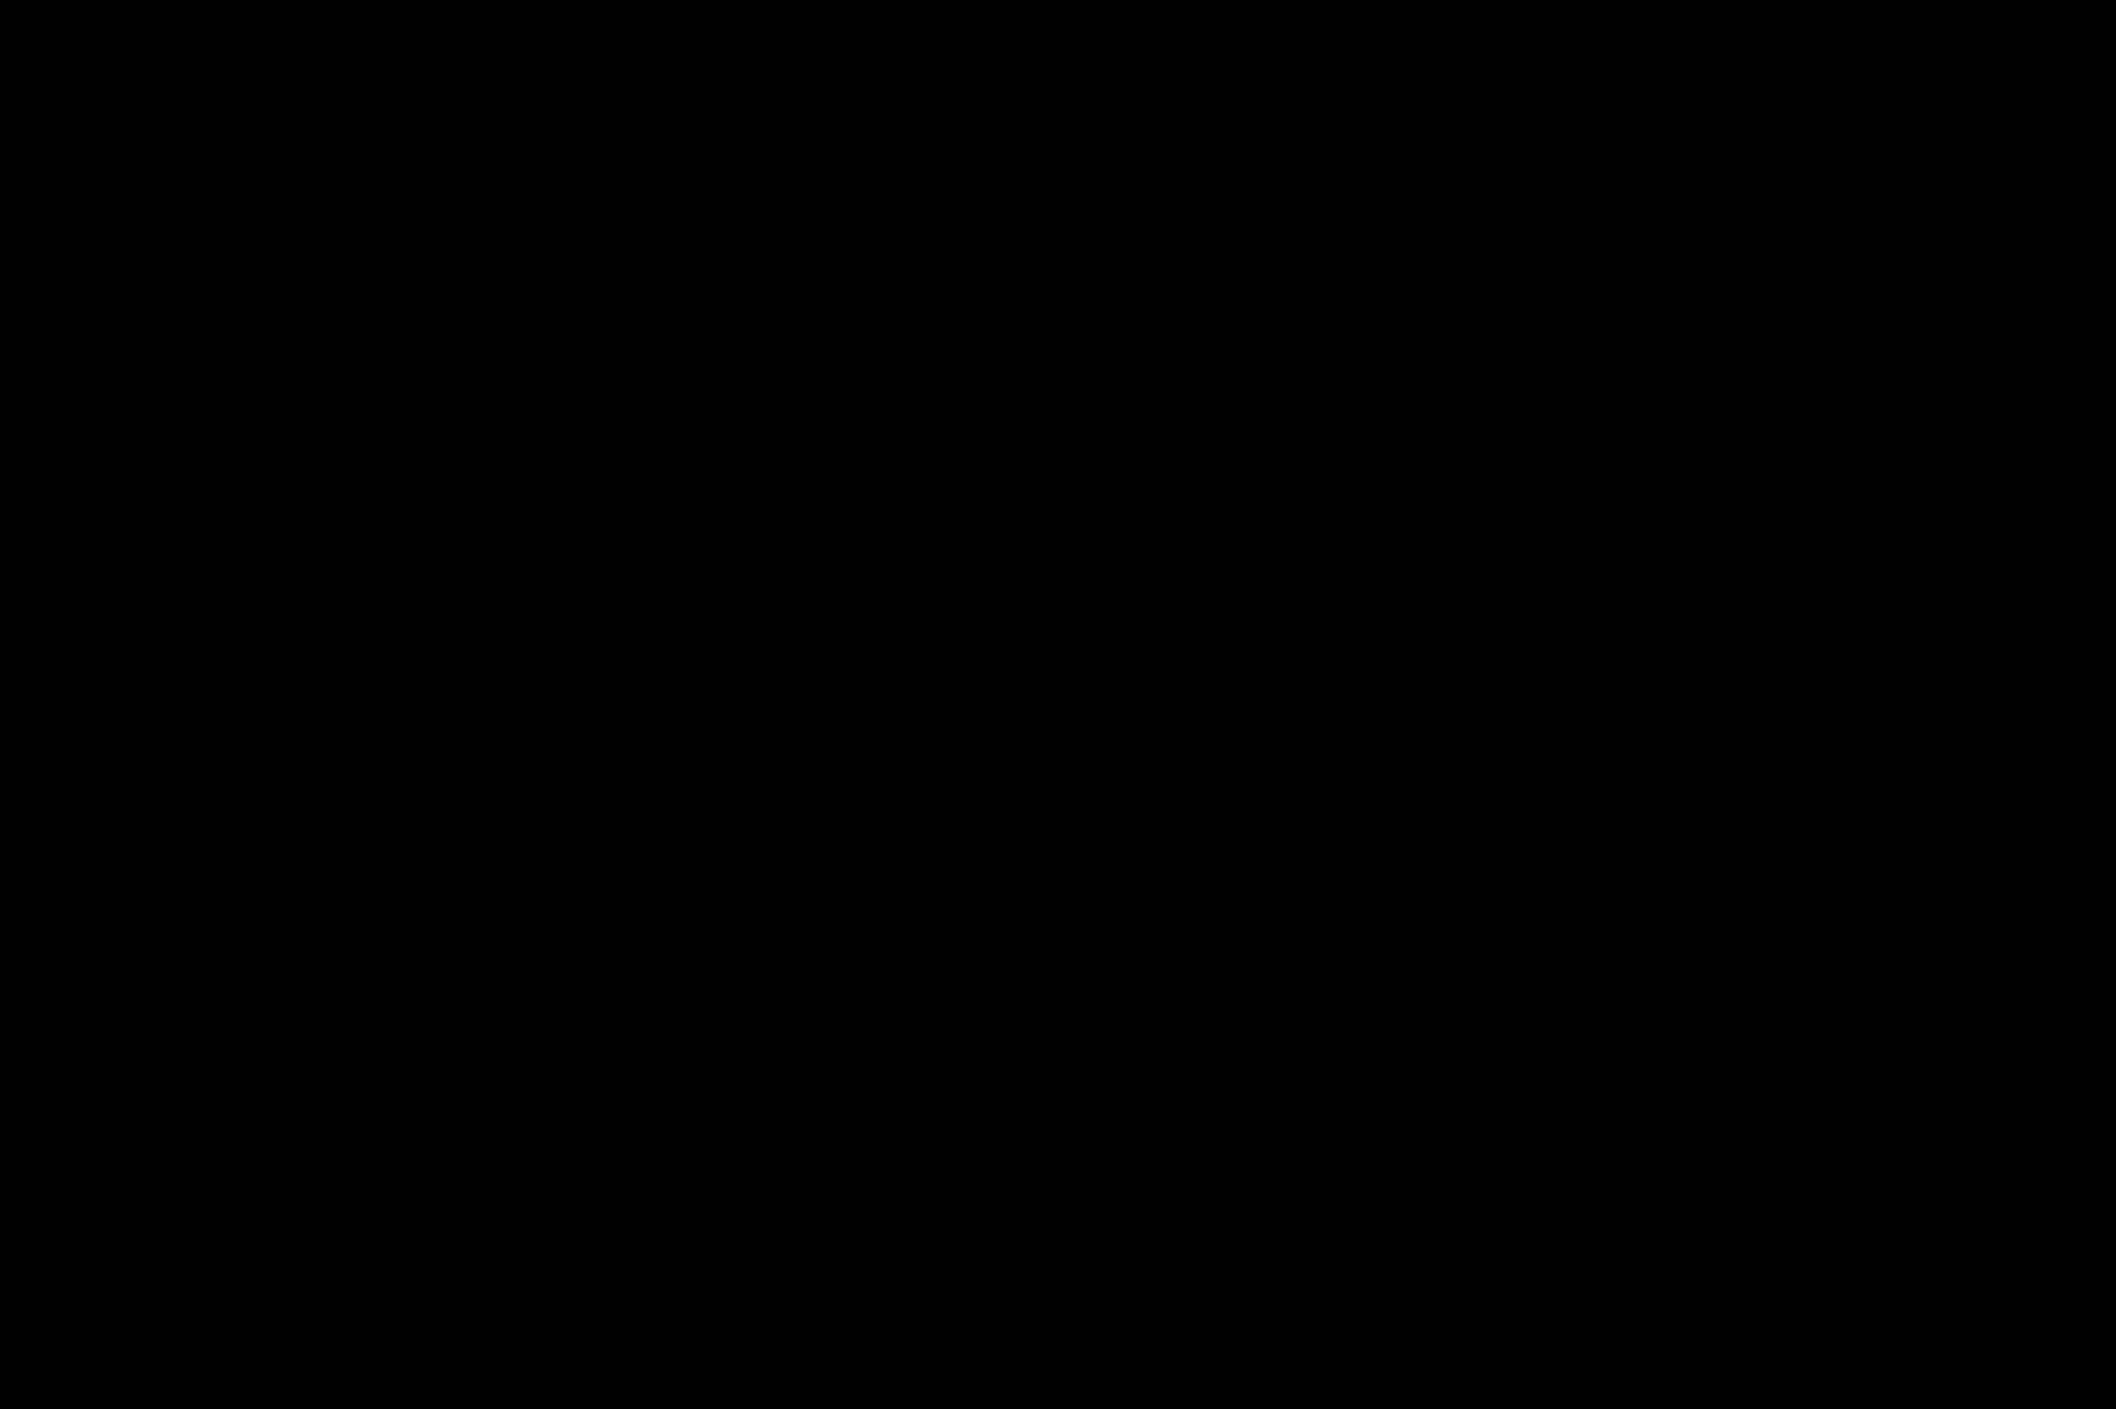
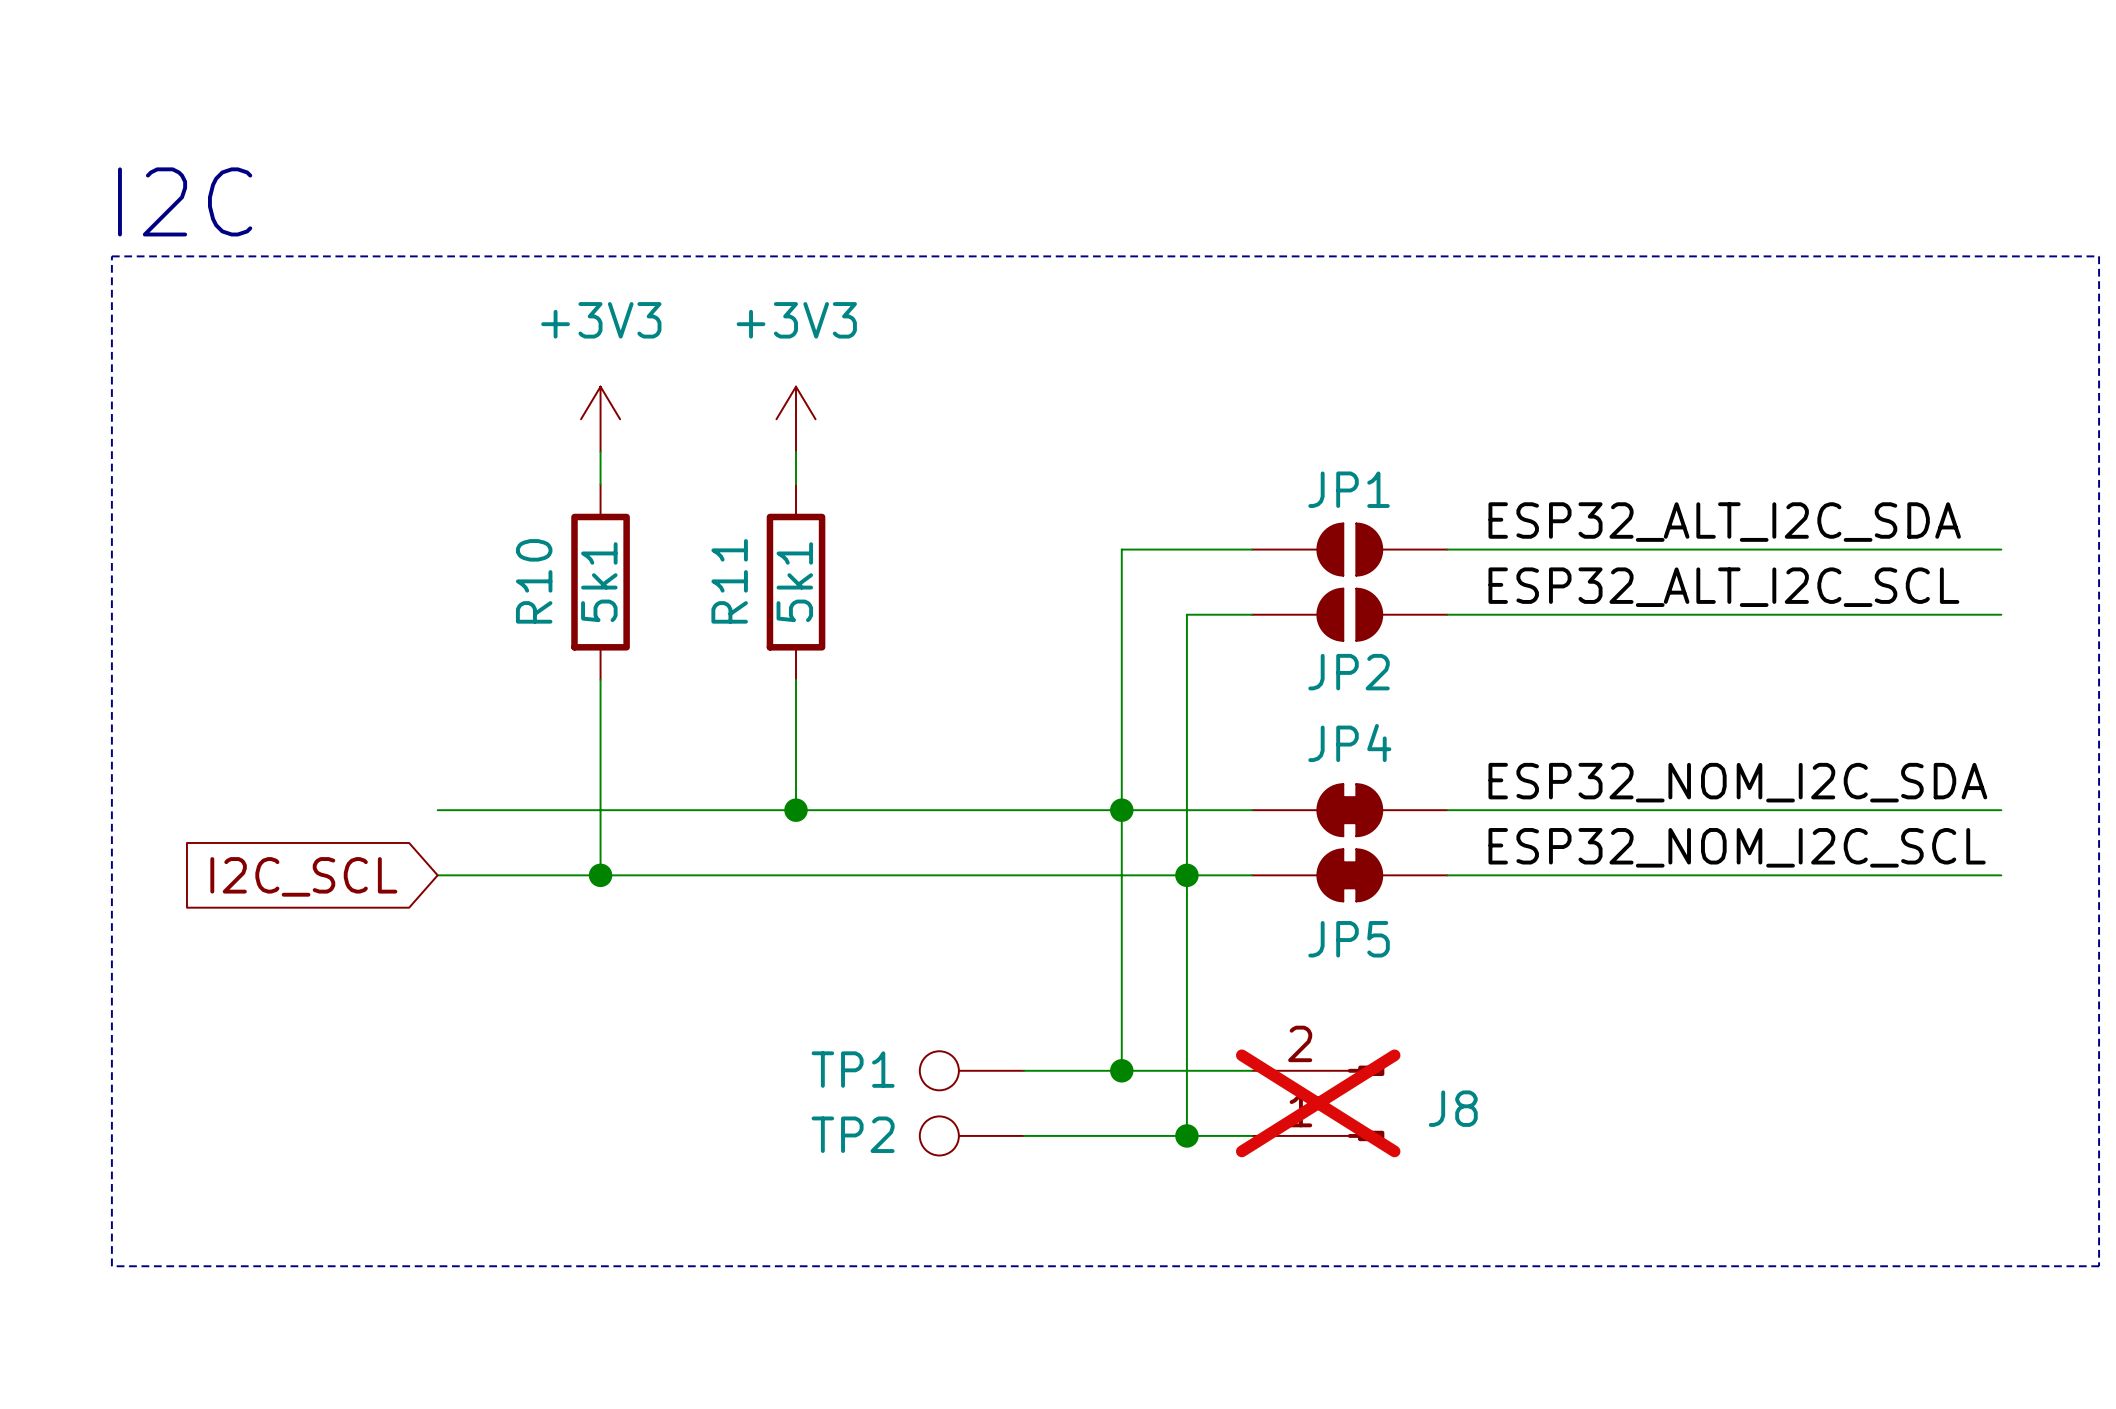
text: none -> I2C (185, 201)
line: none -> (111, 256) (111, 1266) (2099, 1266) (2099, 256) (111, 256)
power symbol: none -> +3V3 (600, 419)
power symbol: none -> +3V3 (796, 419)
wire: none -> (600, 451) (600, 484)
wire: none -> (796, 451) (796, 484)
label: none -> ESP32_ALT_I2C_SDA (1724, 522)
wire: none -> (1252, 549) (1121, 549) (1121, 1070)
JP1: none -> (1349, 549)
wire: none -> (1447, 549) (2001, 549)
R10: none -> 5k1 (600, 582)
R11: none -> 5k1 (796, 582)
label: none -> ESP32_ALT_I2C_SCL (1723, 587)
wire: none -> (1252, 614) (1186, 614) (1186, 1135)
JP2: none -> (1349, 614)
wire: none -> (1447, 614) (2001, 614)
wire: none -> (600, 679) (600, 875)
wire: none -> (796, 679) (796, 810)
label: none -> ESP32_NOM_I2C_SDA (1737, 782)
wire: none -> (437, 810) (1252, 810)
junction: none -> (796, 810)
junction: none -> (1121, 810)
JP4: none -> (1349, 810)
wire: none -> (1447, 810) (2001, 810)
label: none -> ESP32_NOM_I2C_SCL (1737, 847)
wire: none -> (437, 875) (1252, 875)
junction: none -> (600, 875)
junction: none -> (1186, 875)
JP5: none -> (1349, 875)
wire: none -> (1447, 875) (2001, 875)
global label: none -> I2C_SCL (303, 876)
TP1: none -> (971, 1070)
wire: none -> (1024, 1070) (1252, 1070)
junction: none -> (1121, 1070)
J8: none -> (1318, 1103)
TP2: none -> (971, 1135)
wire: none -> (1024, 1135) (1252, 1135)
junction: none -> (1186, 1135)

